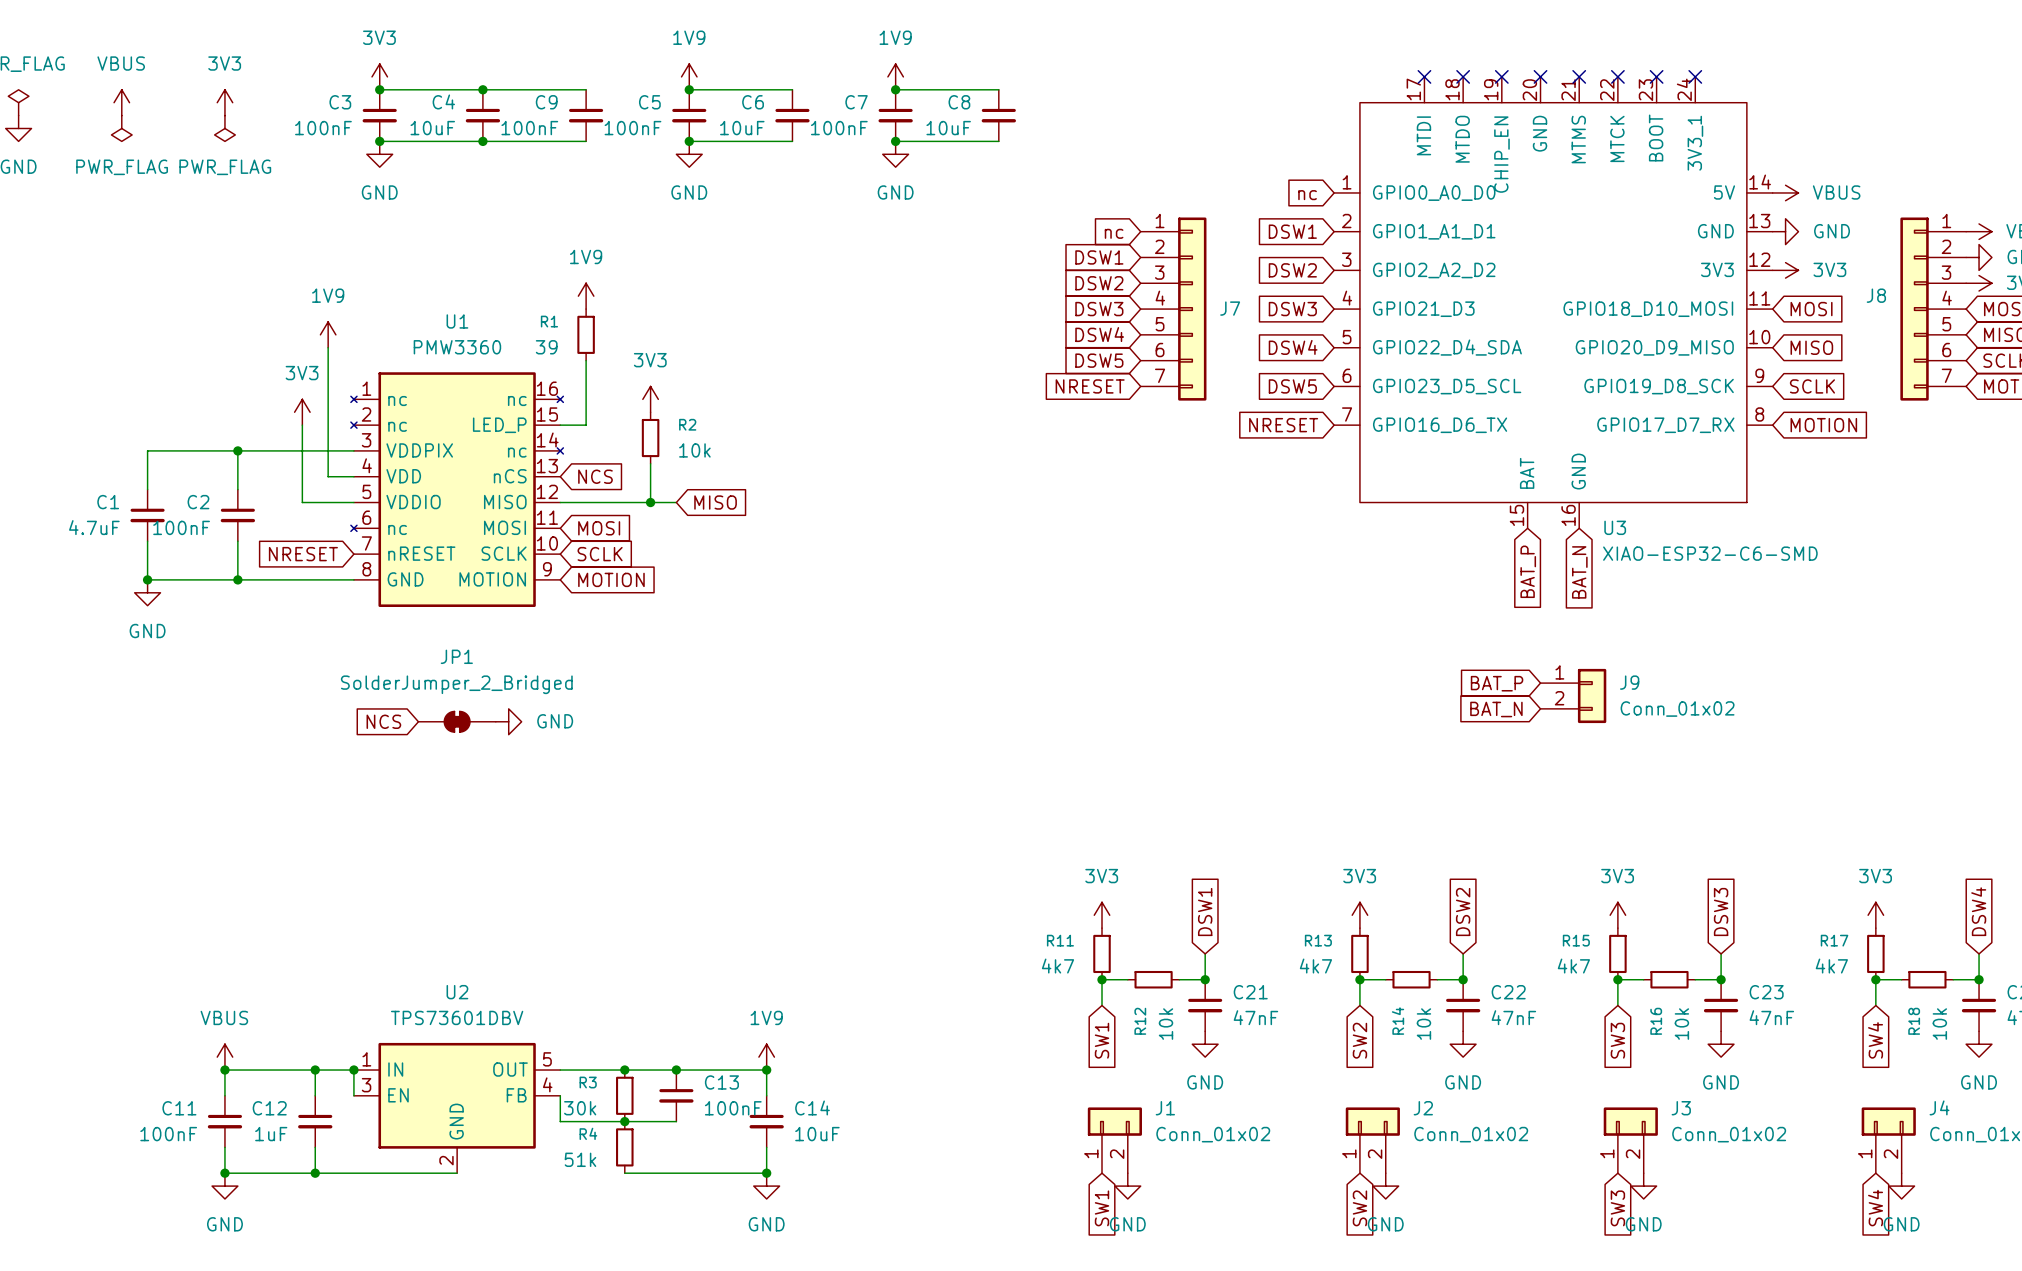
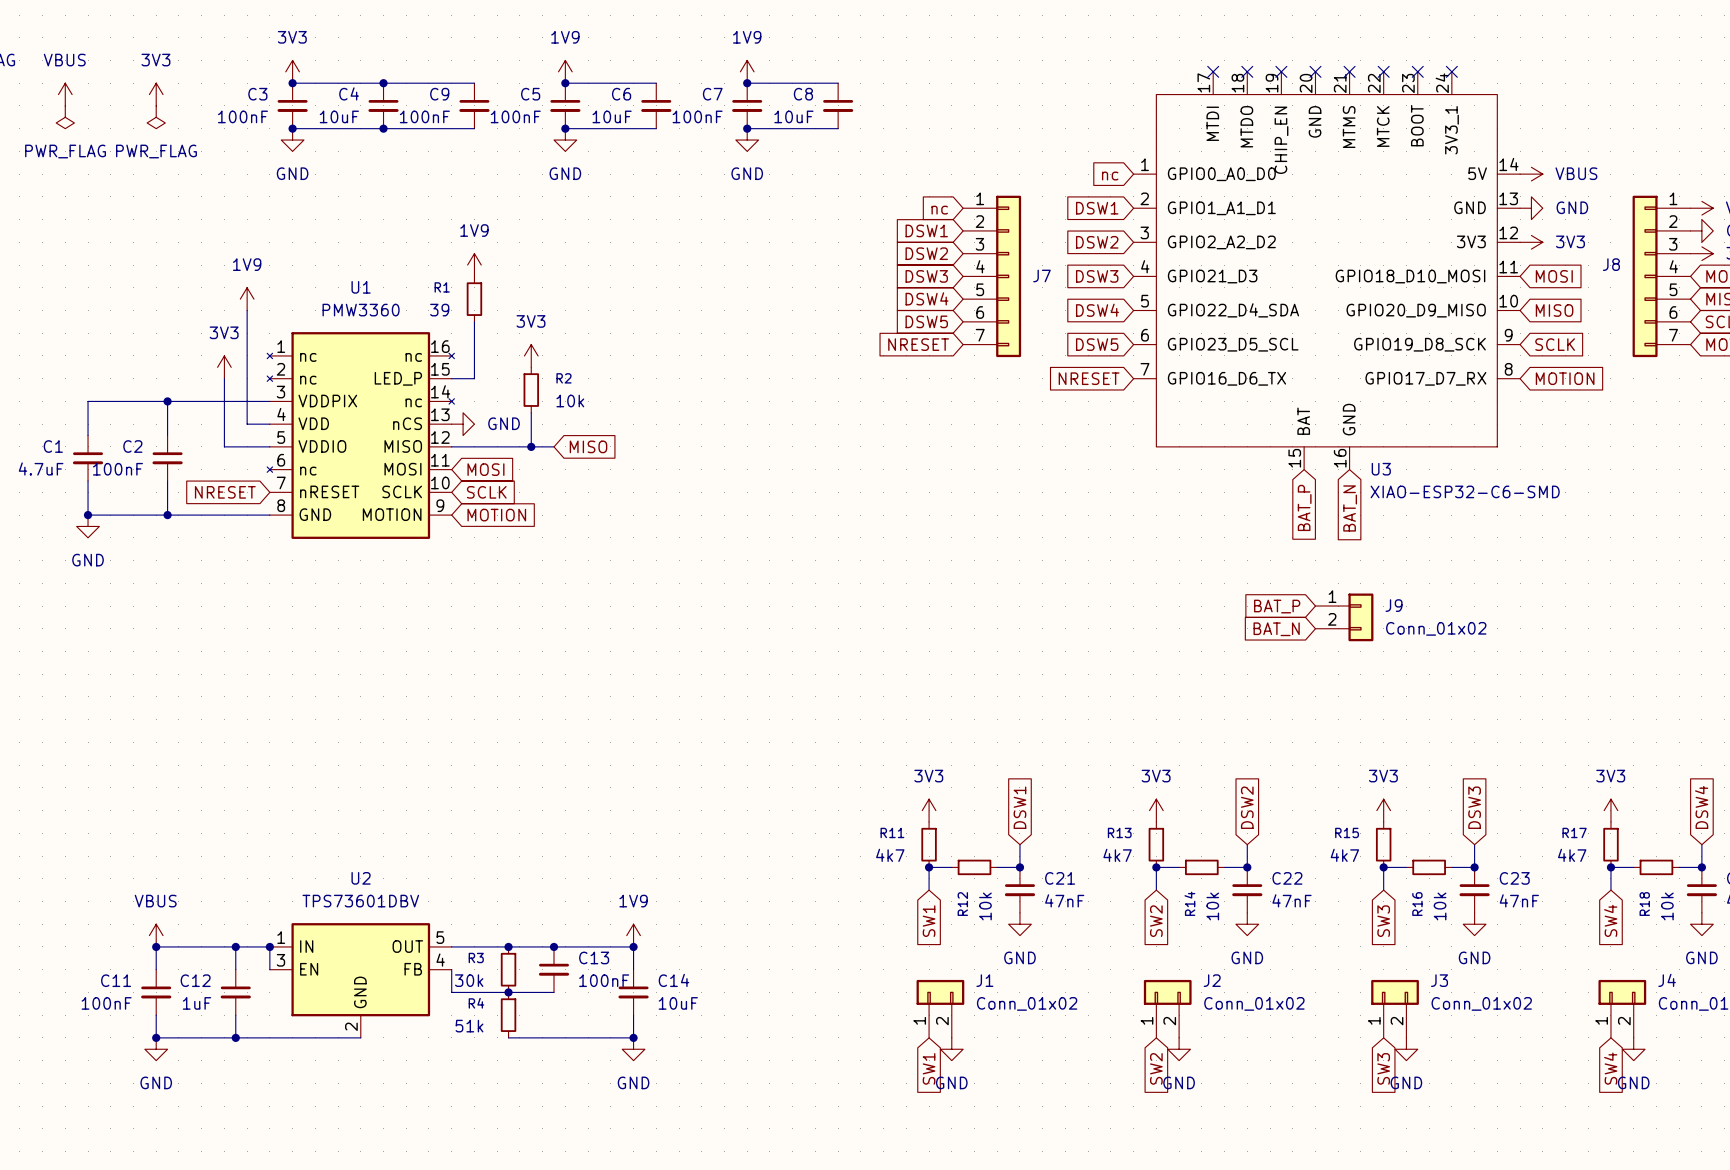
global label: NCS (595, 476) -> none
global label: NCS (383, 721) -> none
JP1: SolderJumper_2_Bridged (457, 721) -> none
power symbol position: GND (508, 721) -> GND (463, 424)

